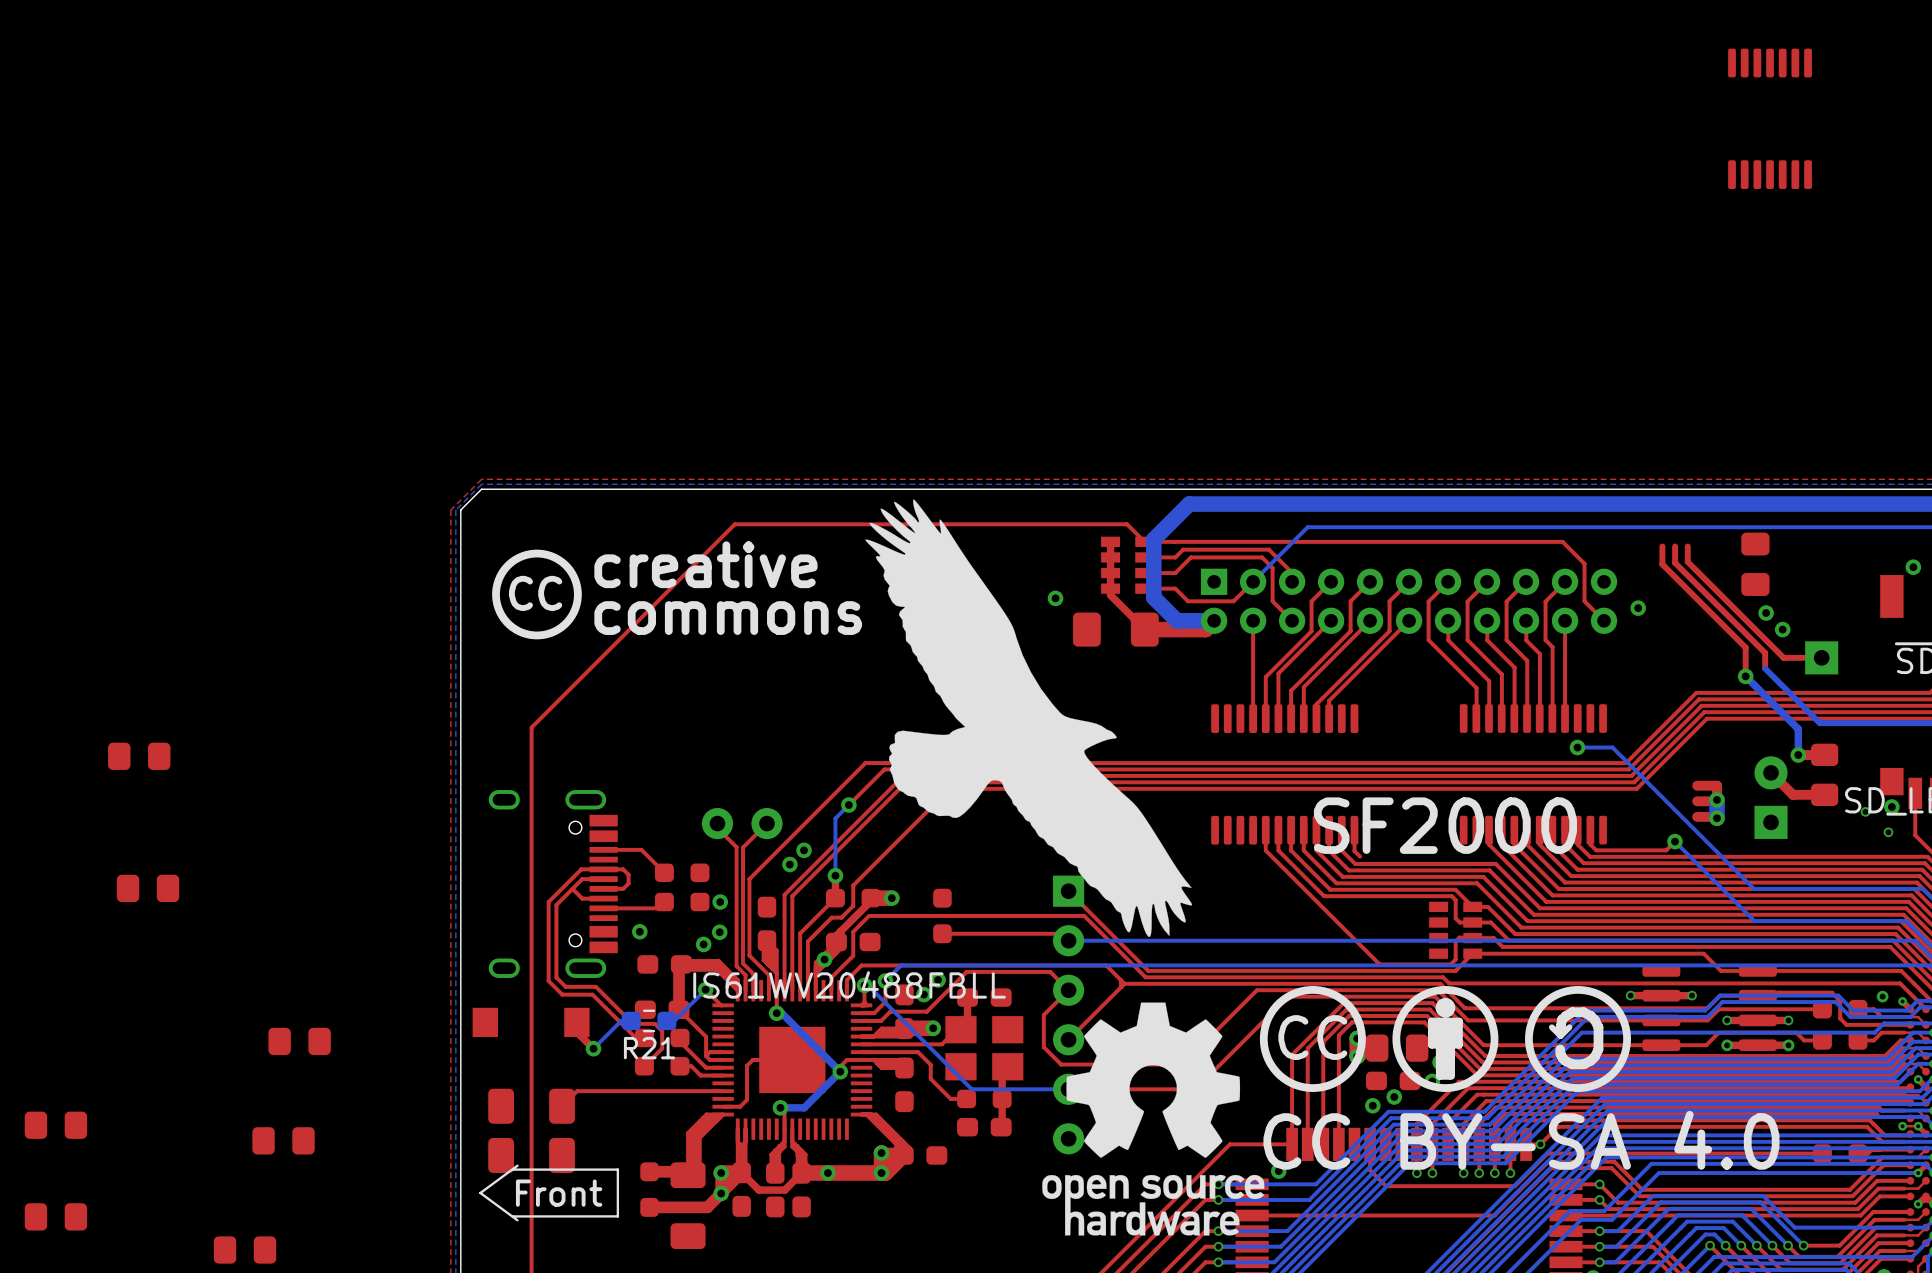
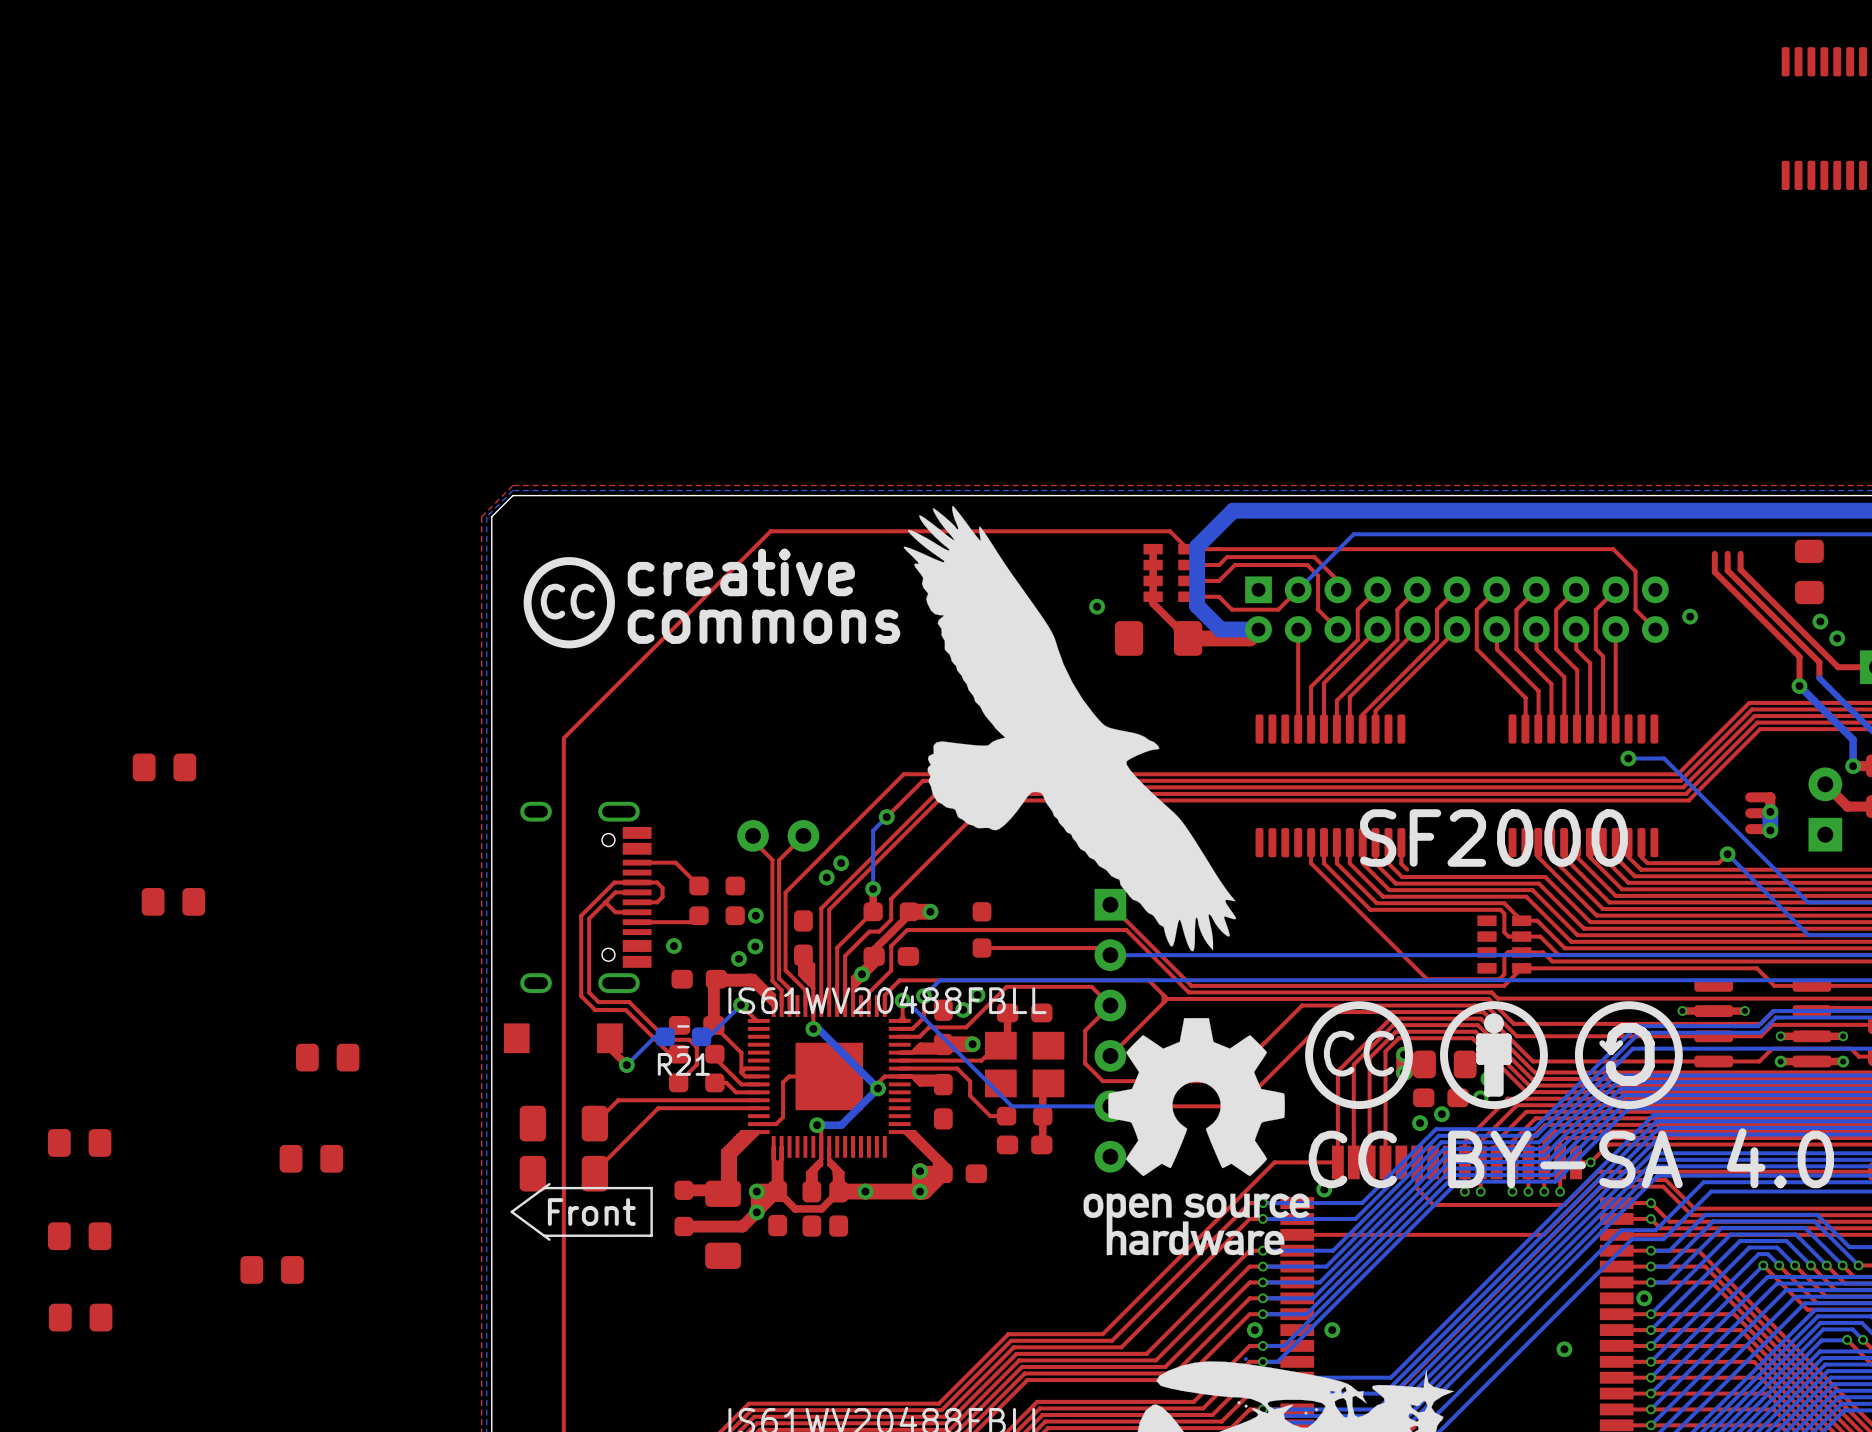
top track: none -> (758, 1100) (618, 1100) (610, 1108)
top track: (624, 1091) (577, 1091) -> (658, 1108) (594, 1171)

